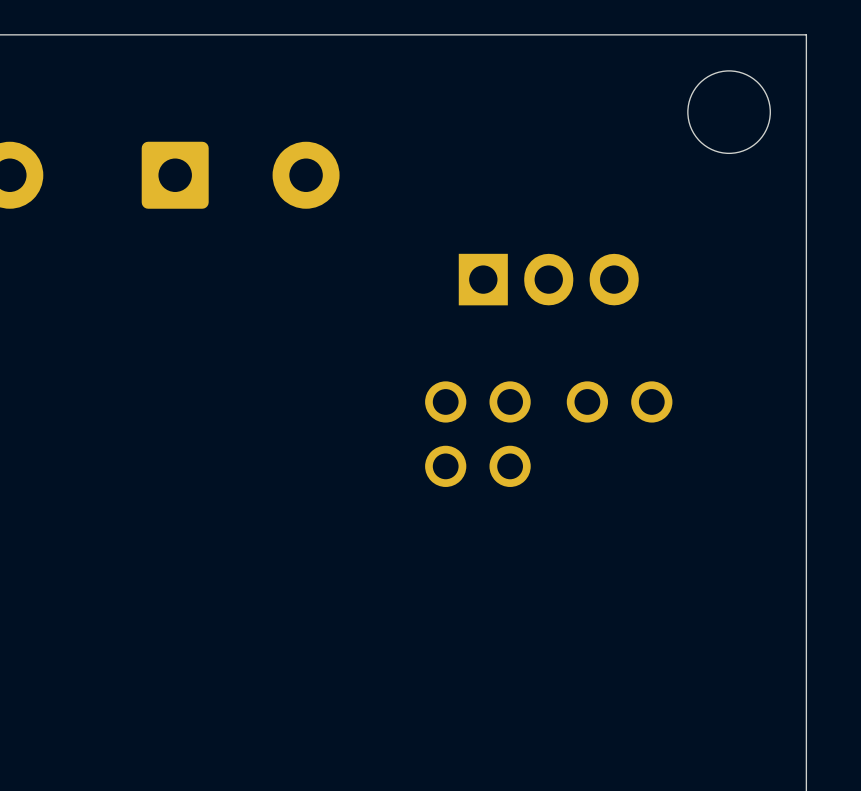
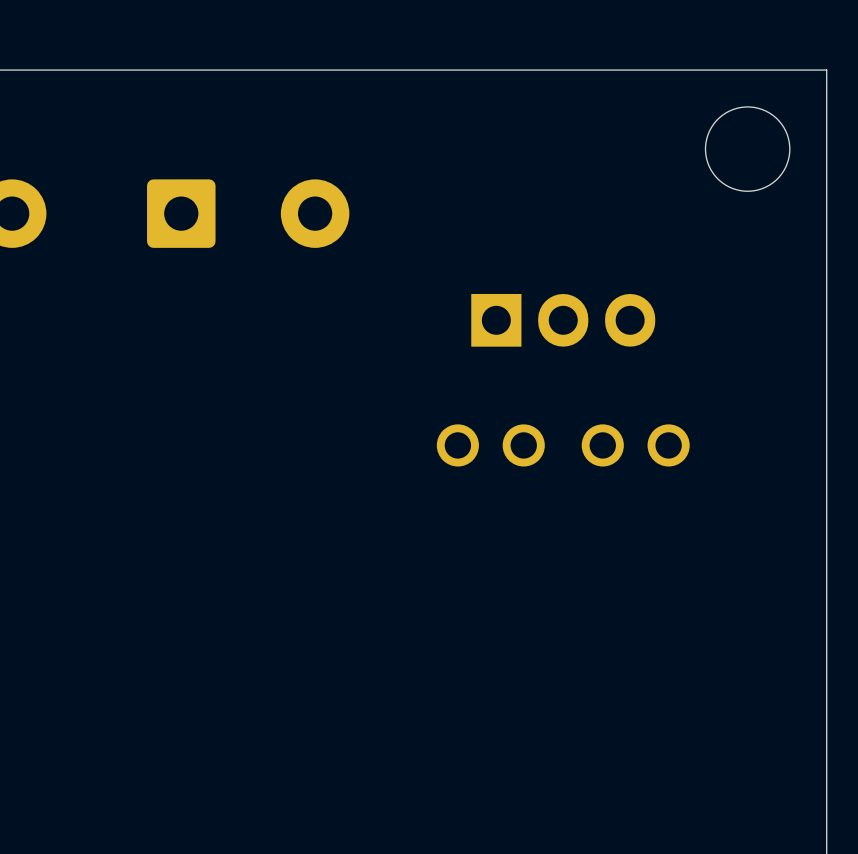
part: (477, 466) -> none

